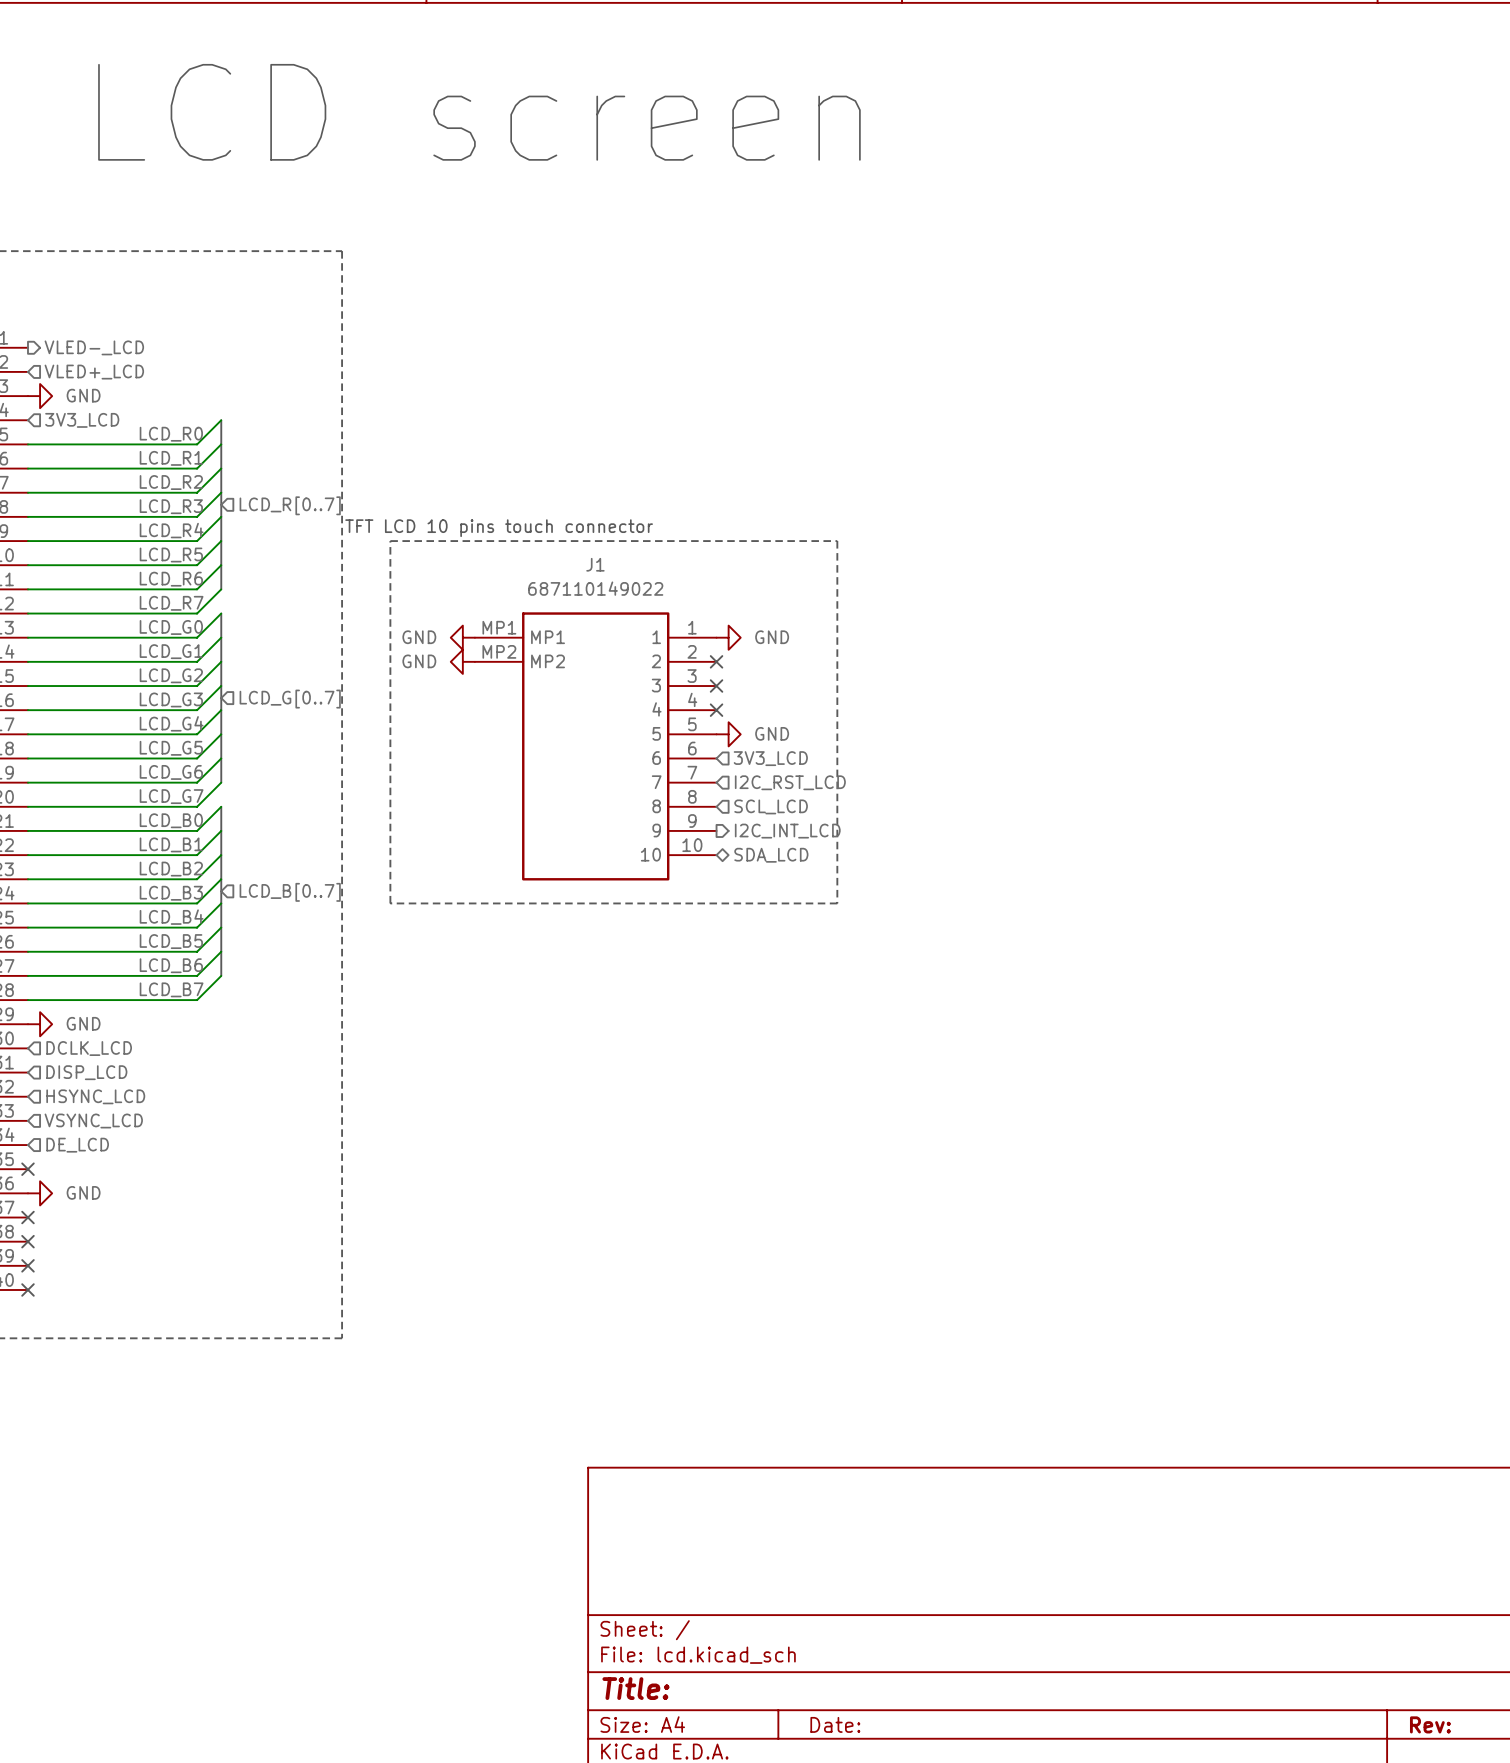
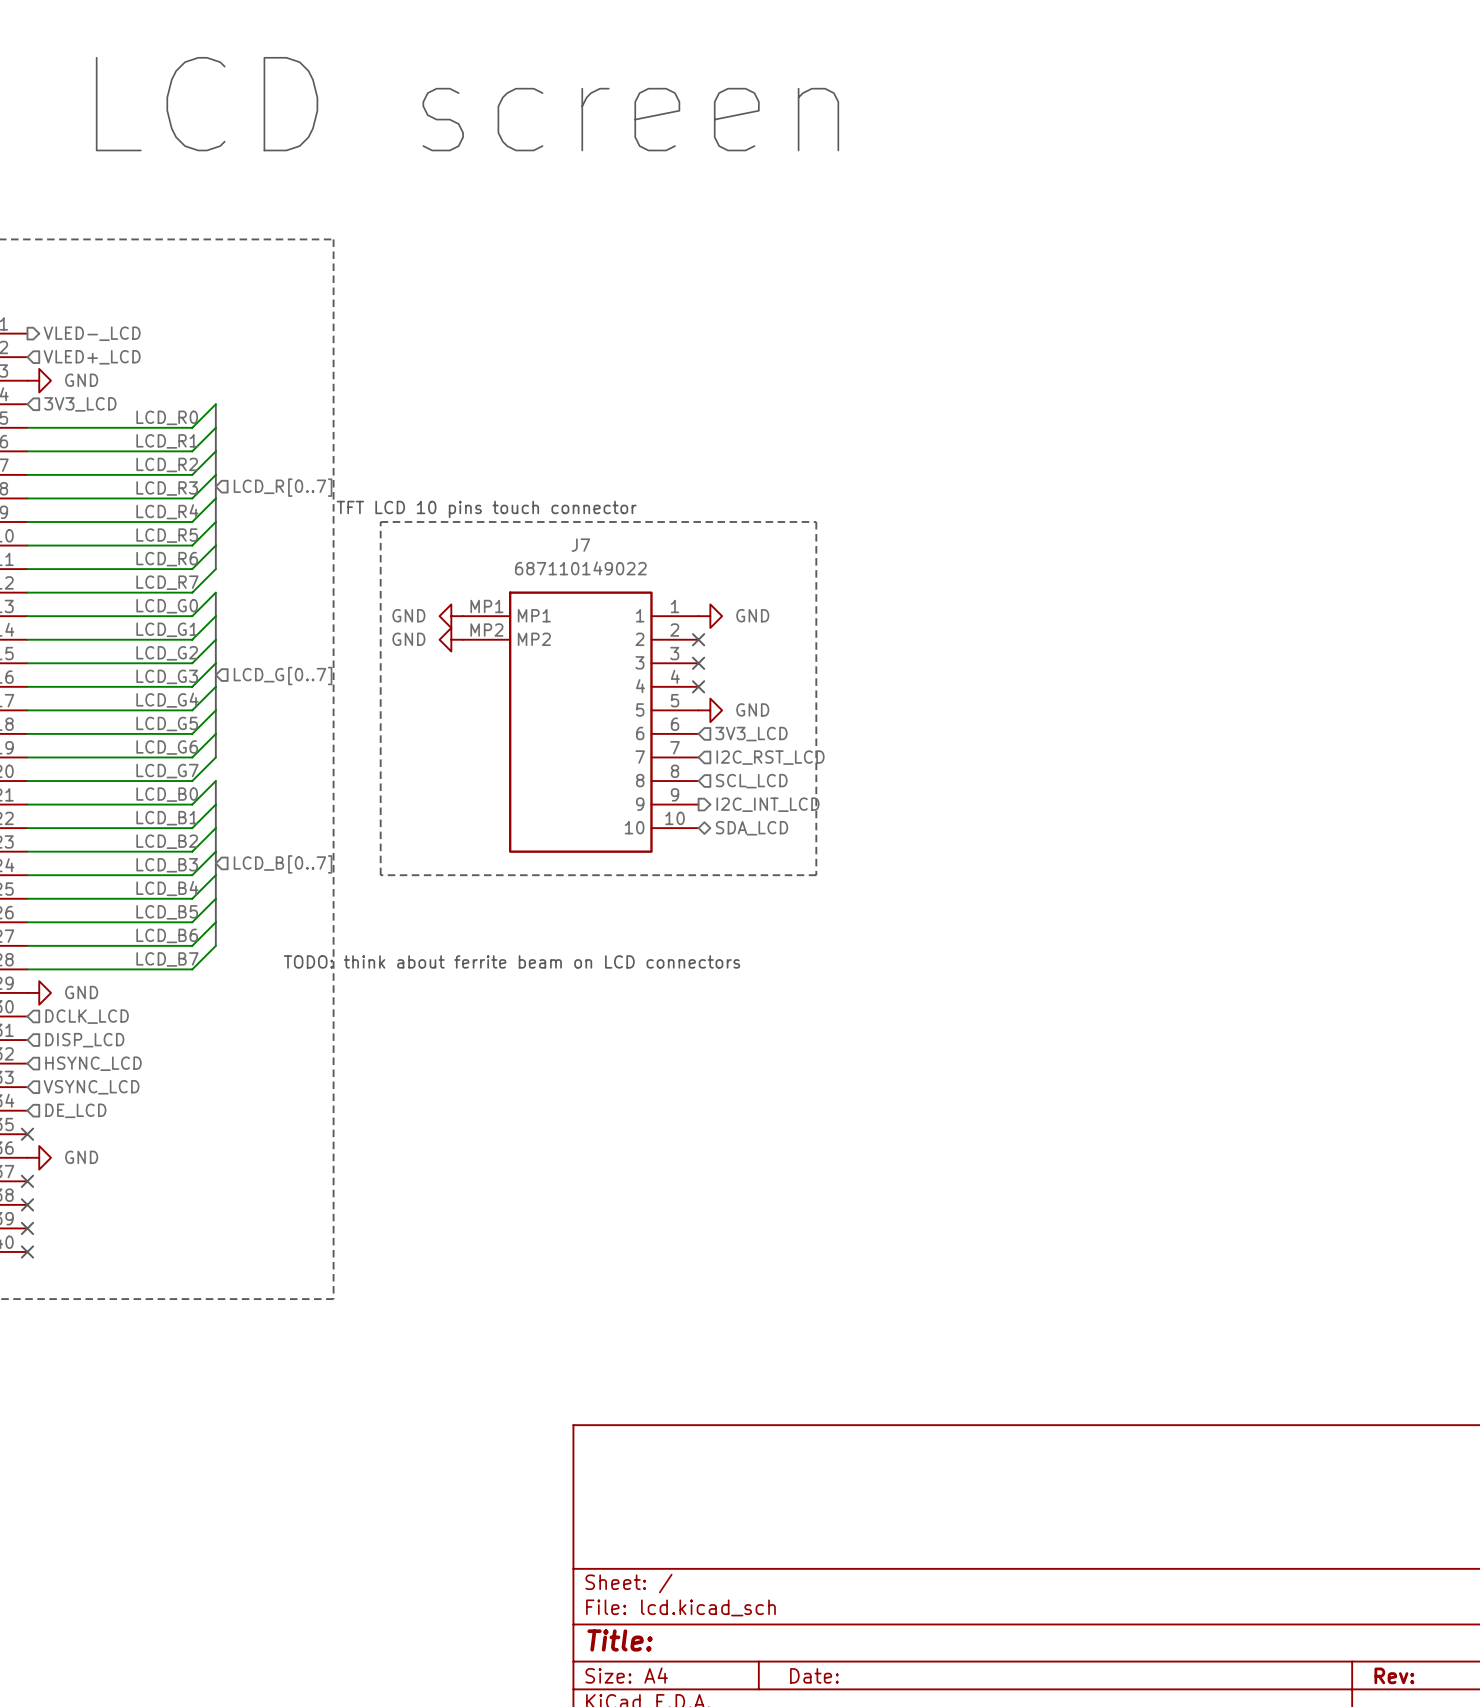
J1 name: J1 (595, 564) -> J7 (580, 545)
text: none -> TODO: think about ferrite beam on LCD connectors (511, 961)

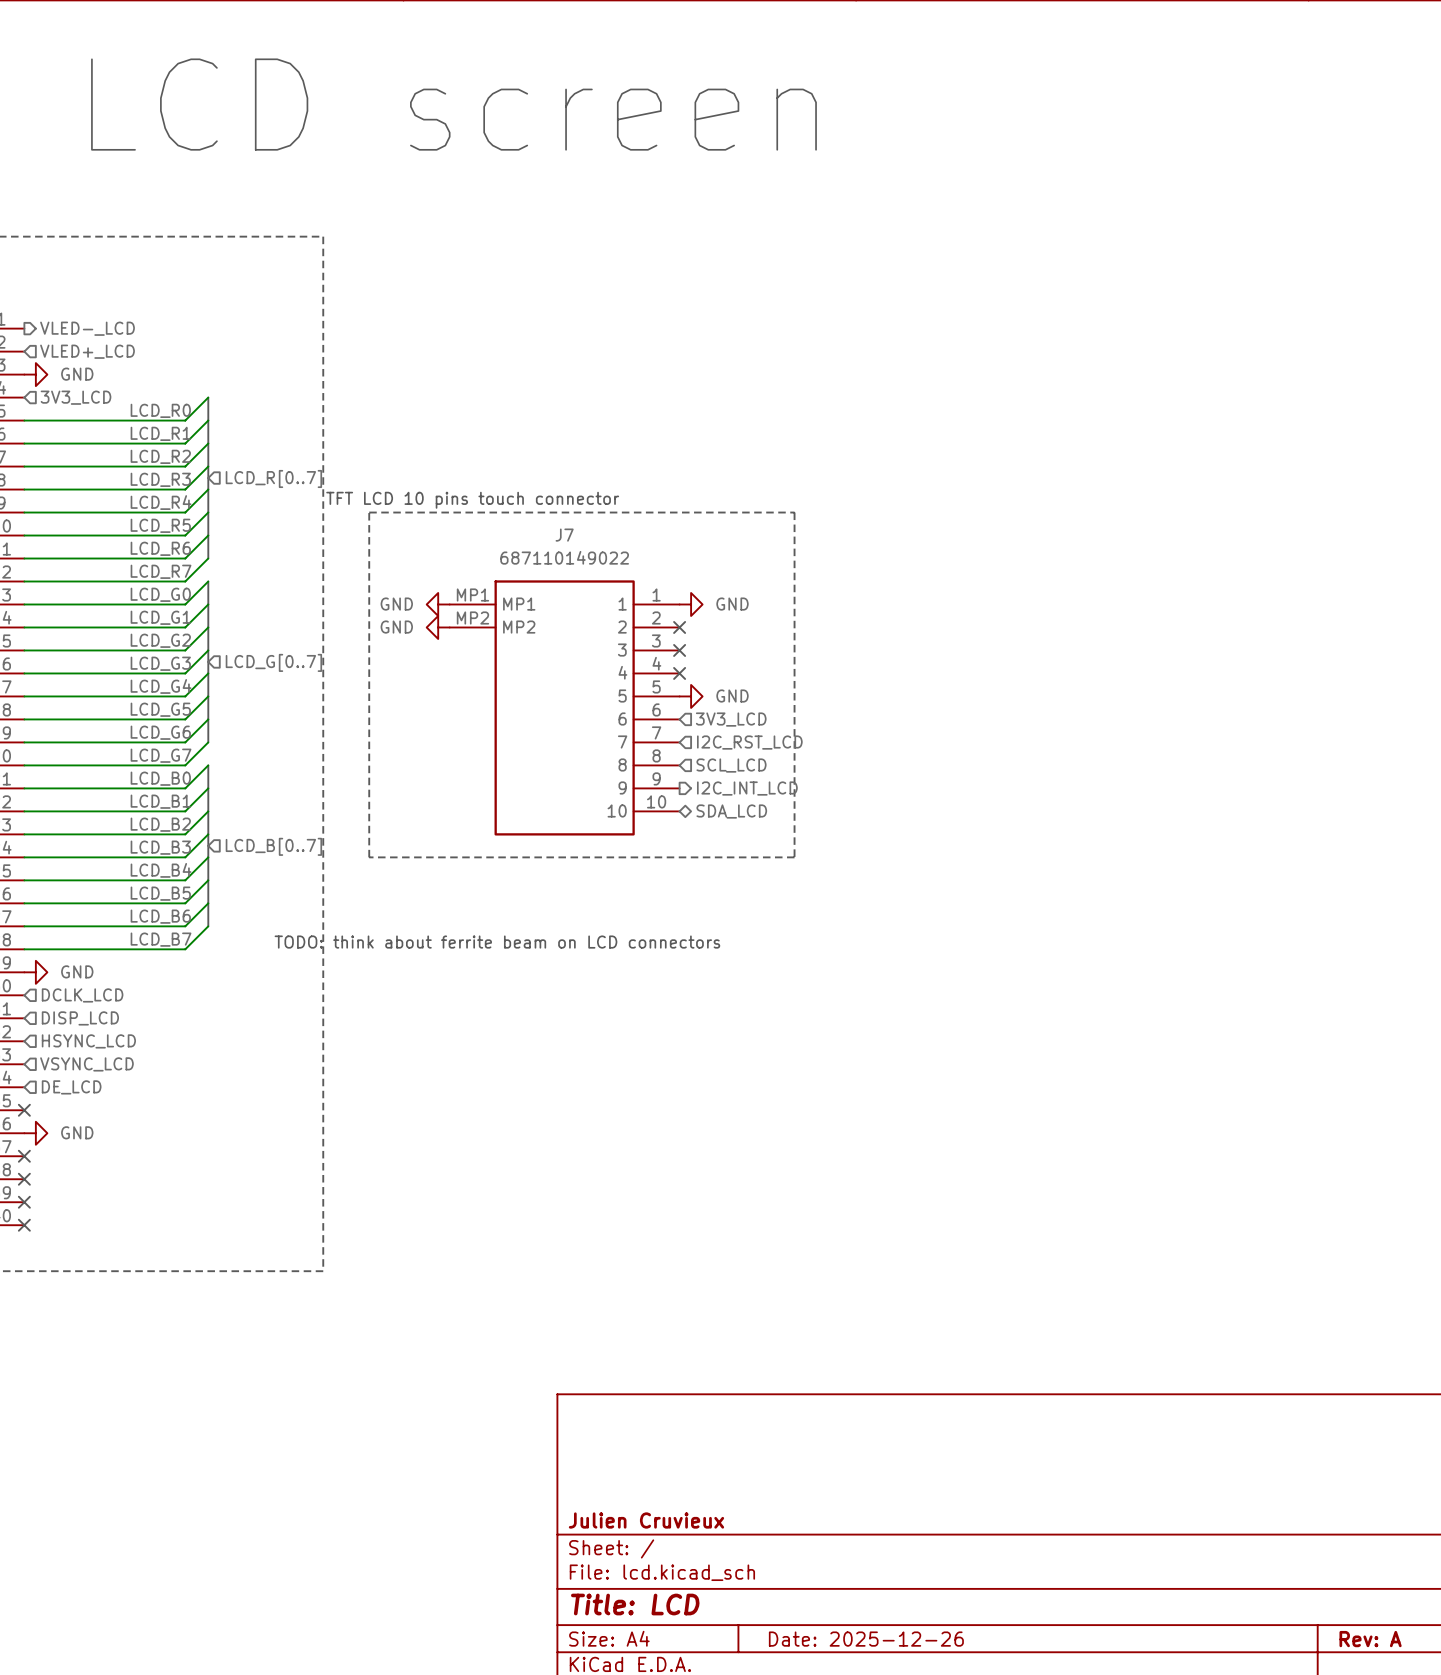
title block: none -> Julien Cruvieux (646, 1520)
title block: Title: (620, 1640) -> Title: LCD (635, 1604)
title block: Date: (814, 1675) -> Date: 2025-12-26 (866, 1639)
title block: Rev: (1394, 1675) -> Rev: A (1370, 1639)

